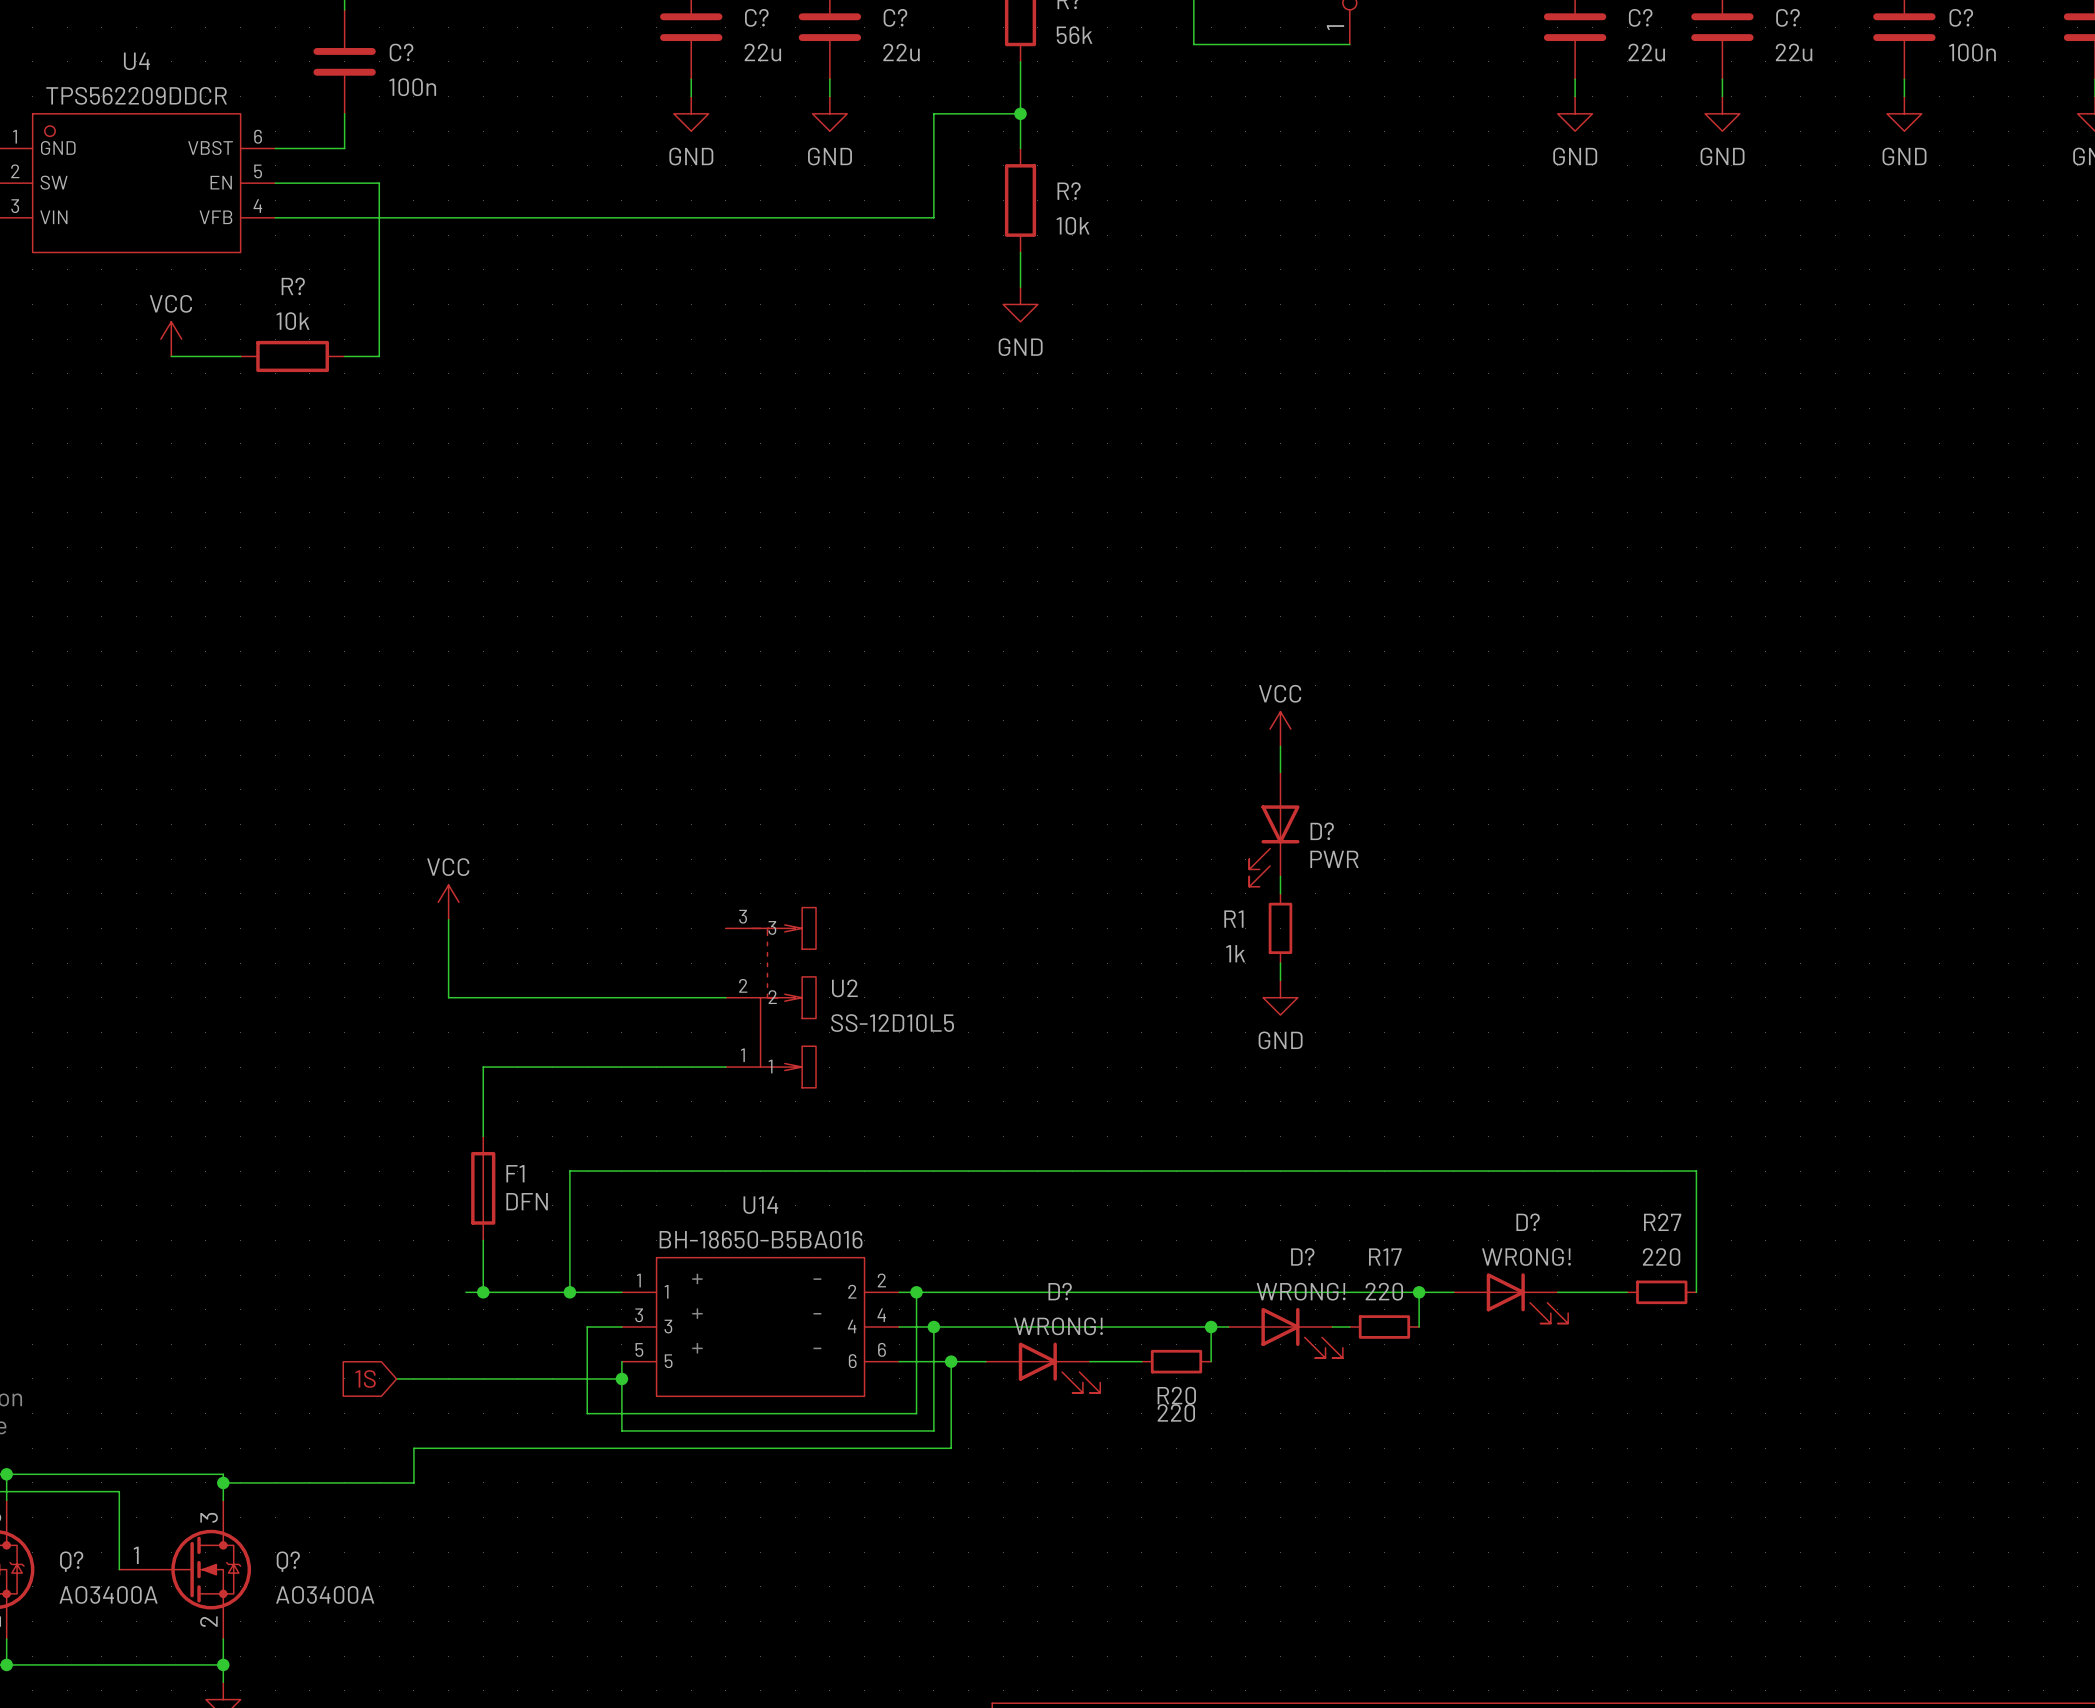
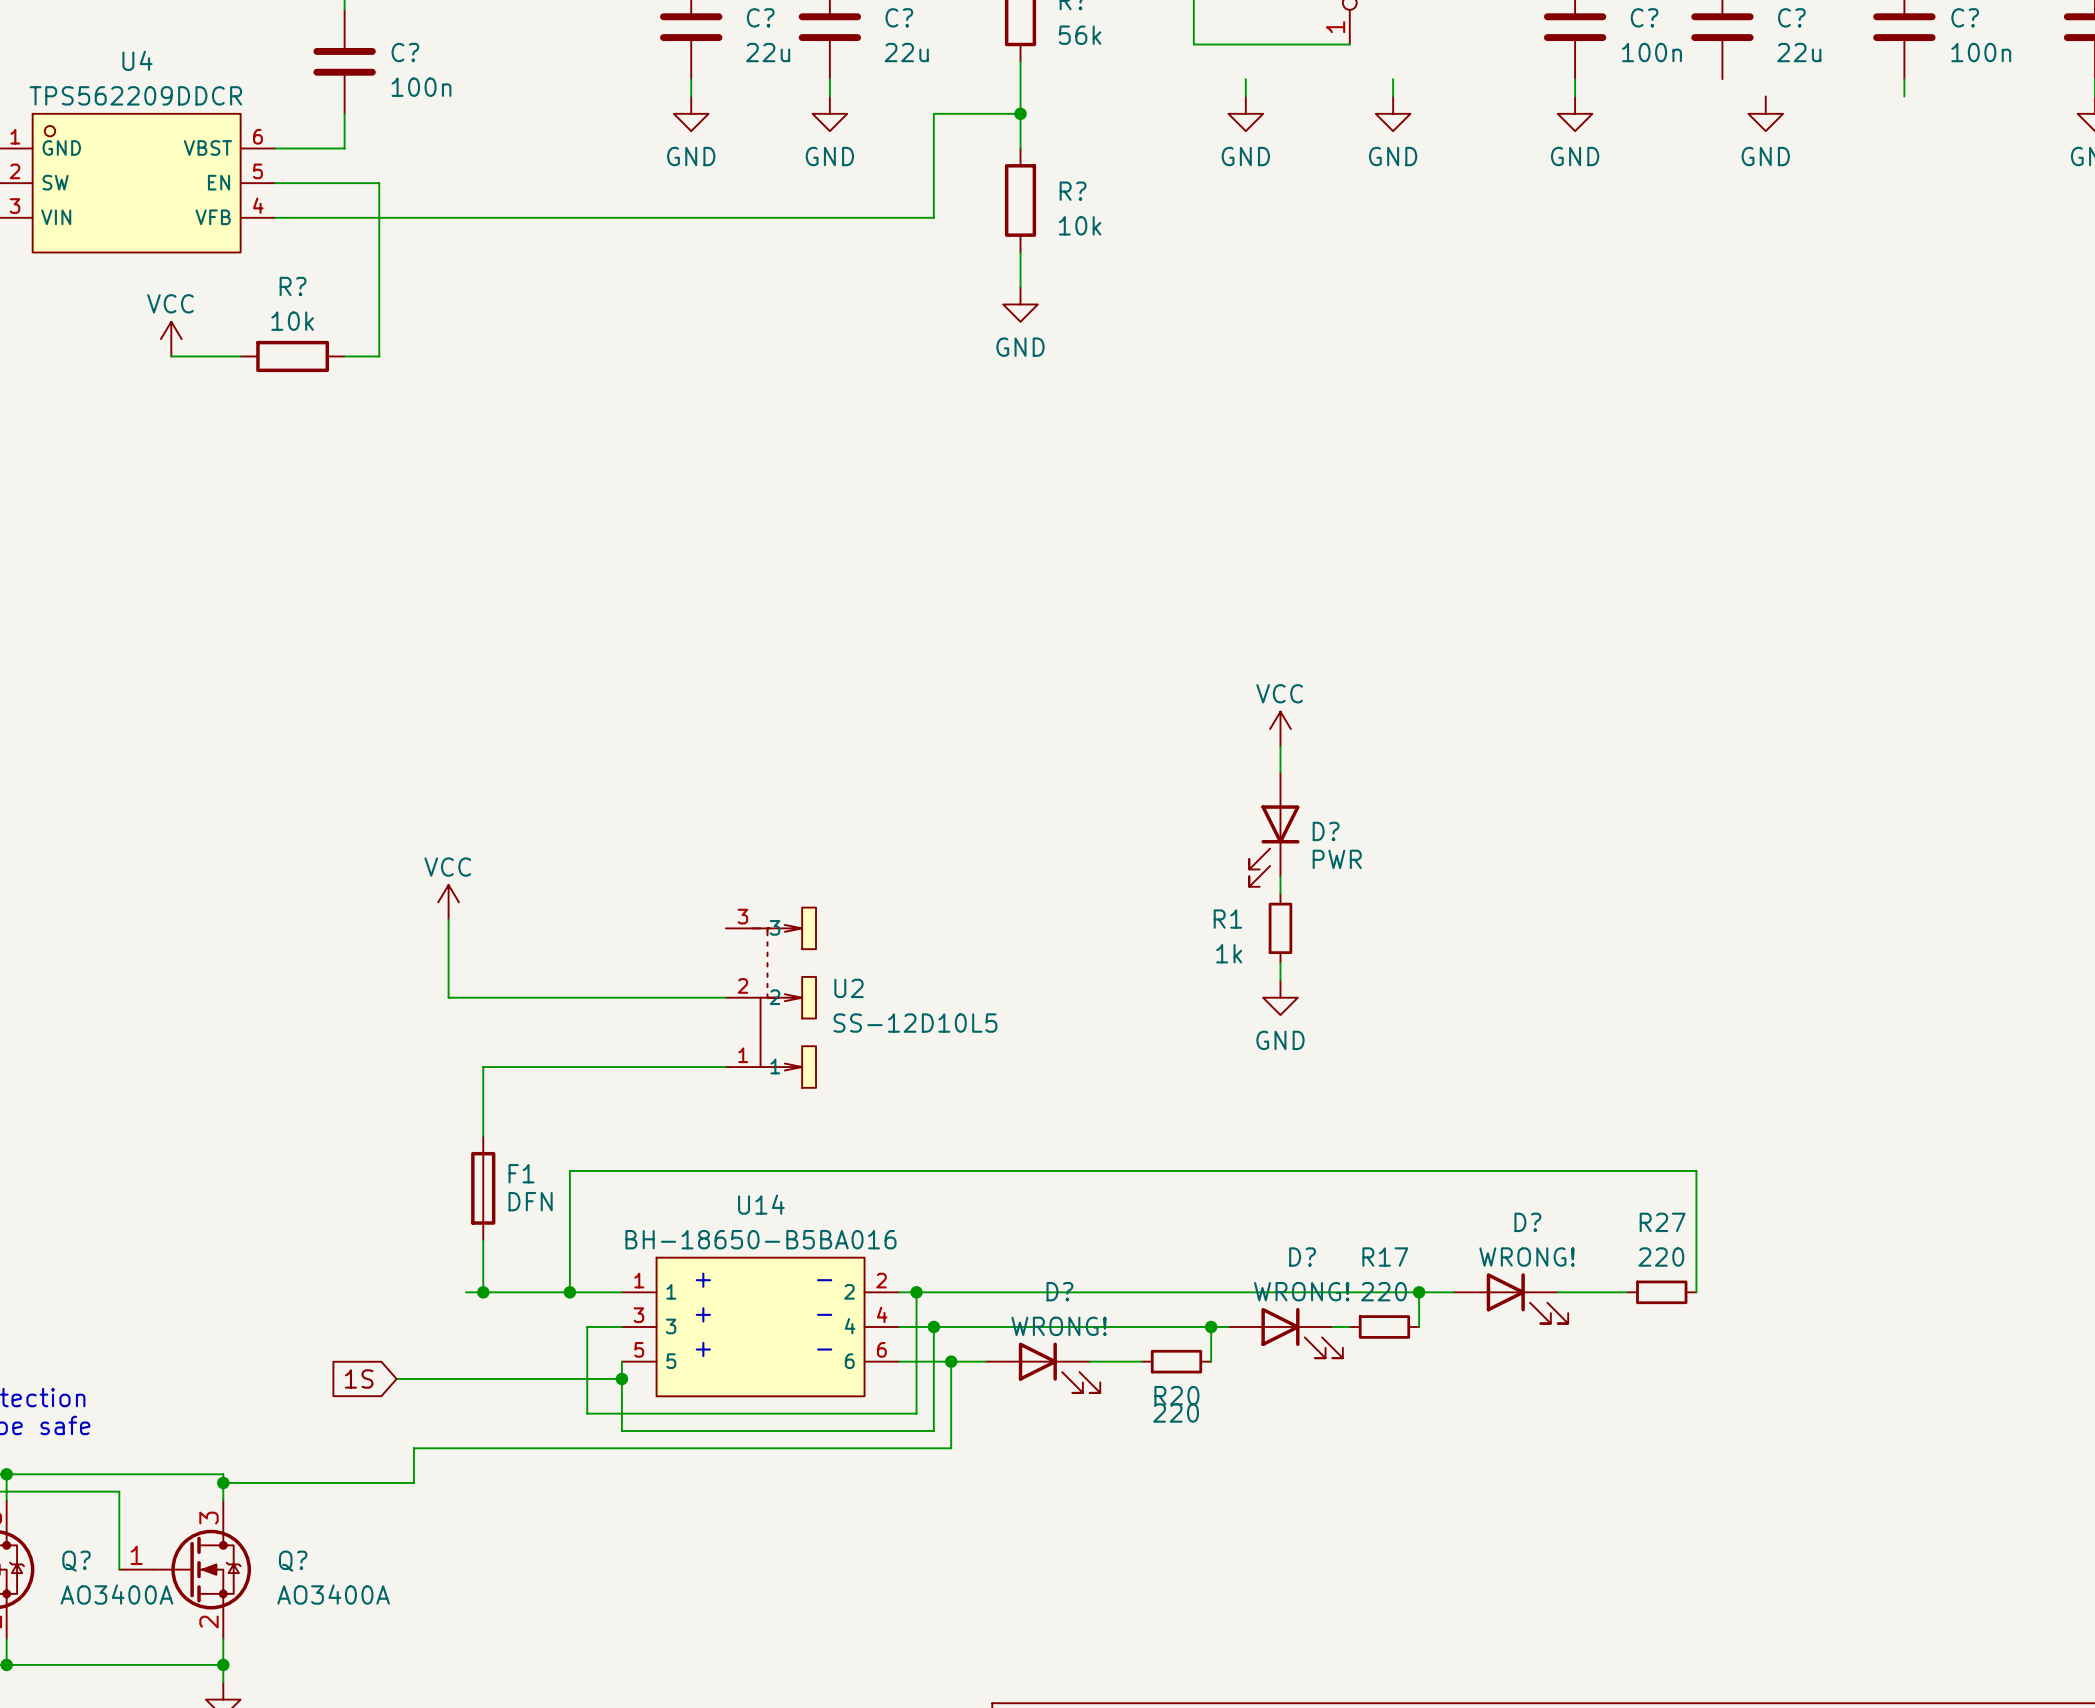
C? value: 22u (1646, 52) -> 100n (1651, 52)
wire: none -> (1245, 79) (1245, 96)
wire: (1722, 79) (1722, 96) -> (1393, 79) (1393, 96)
power symbol: none -> GND (1245, 113)
power symbol: none -> GND (1393, 113)
power symbol position: GND (1722, 113) -> GND (1765, 113)
power symbol: GND (1904, 113) -> none

